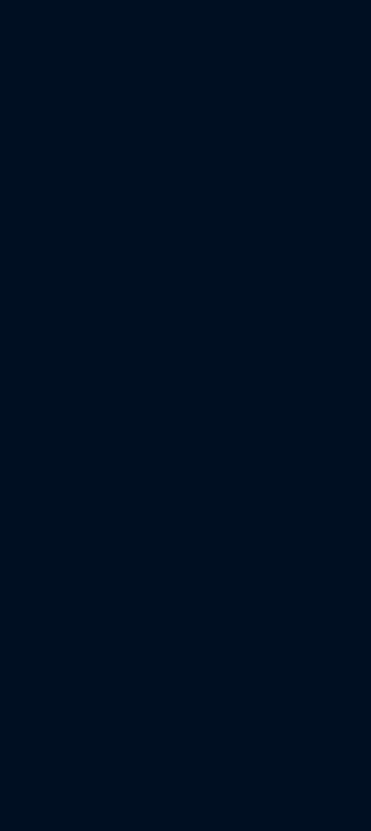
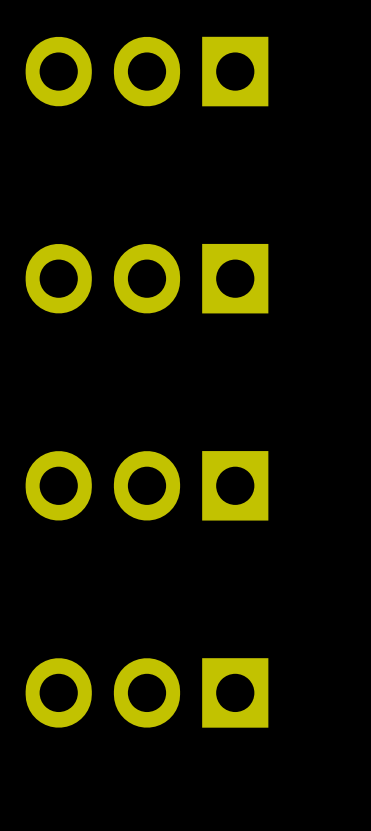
part: none -> (146, 71)
part: none -> (146, 278)
part: none -> (146, 485)
part: none -> (146, 692)

